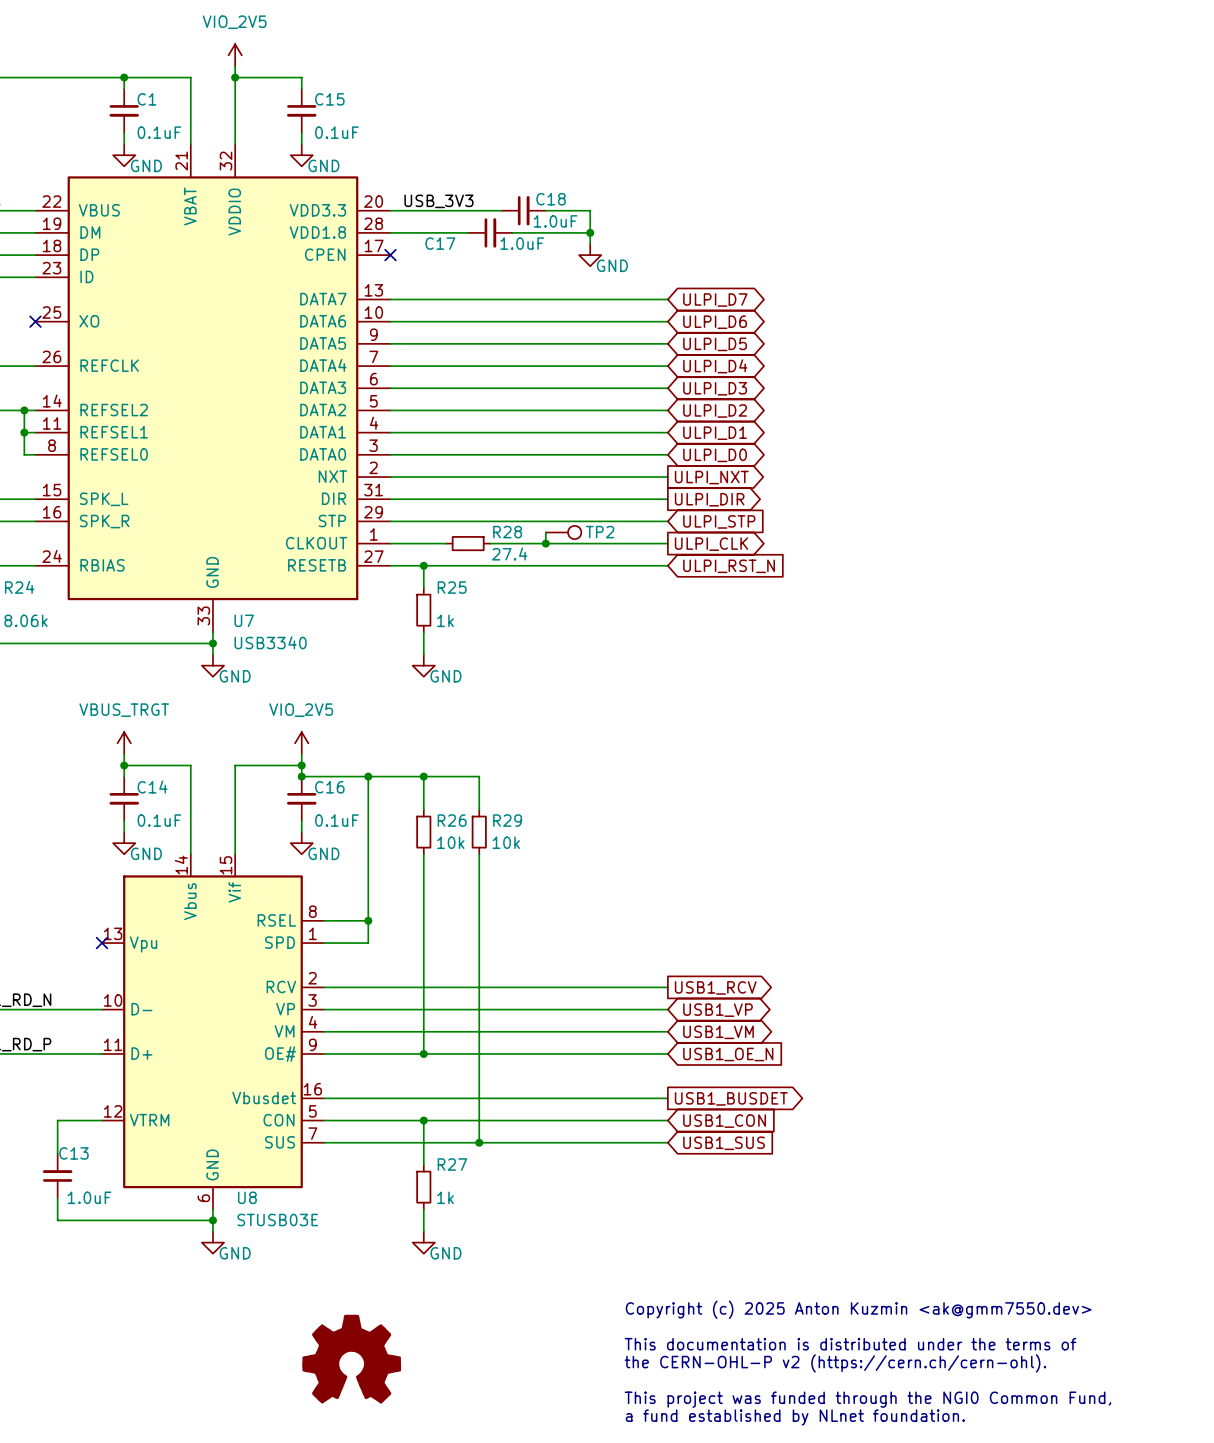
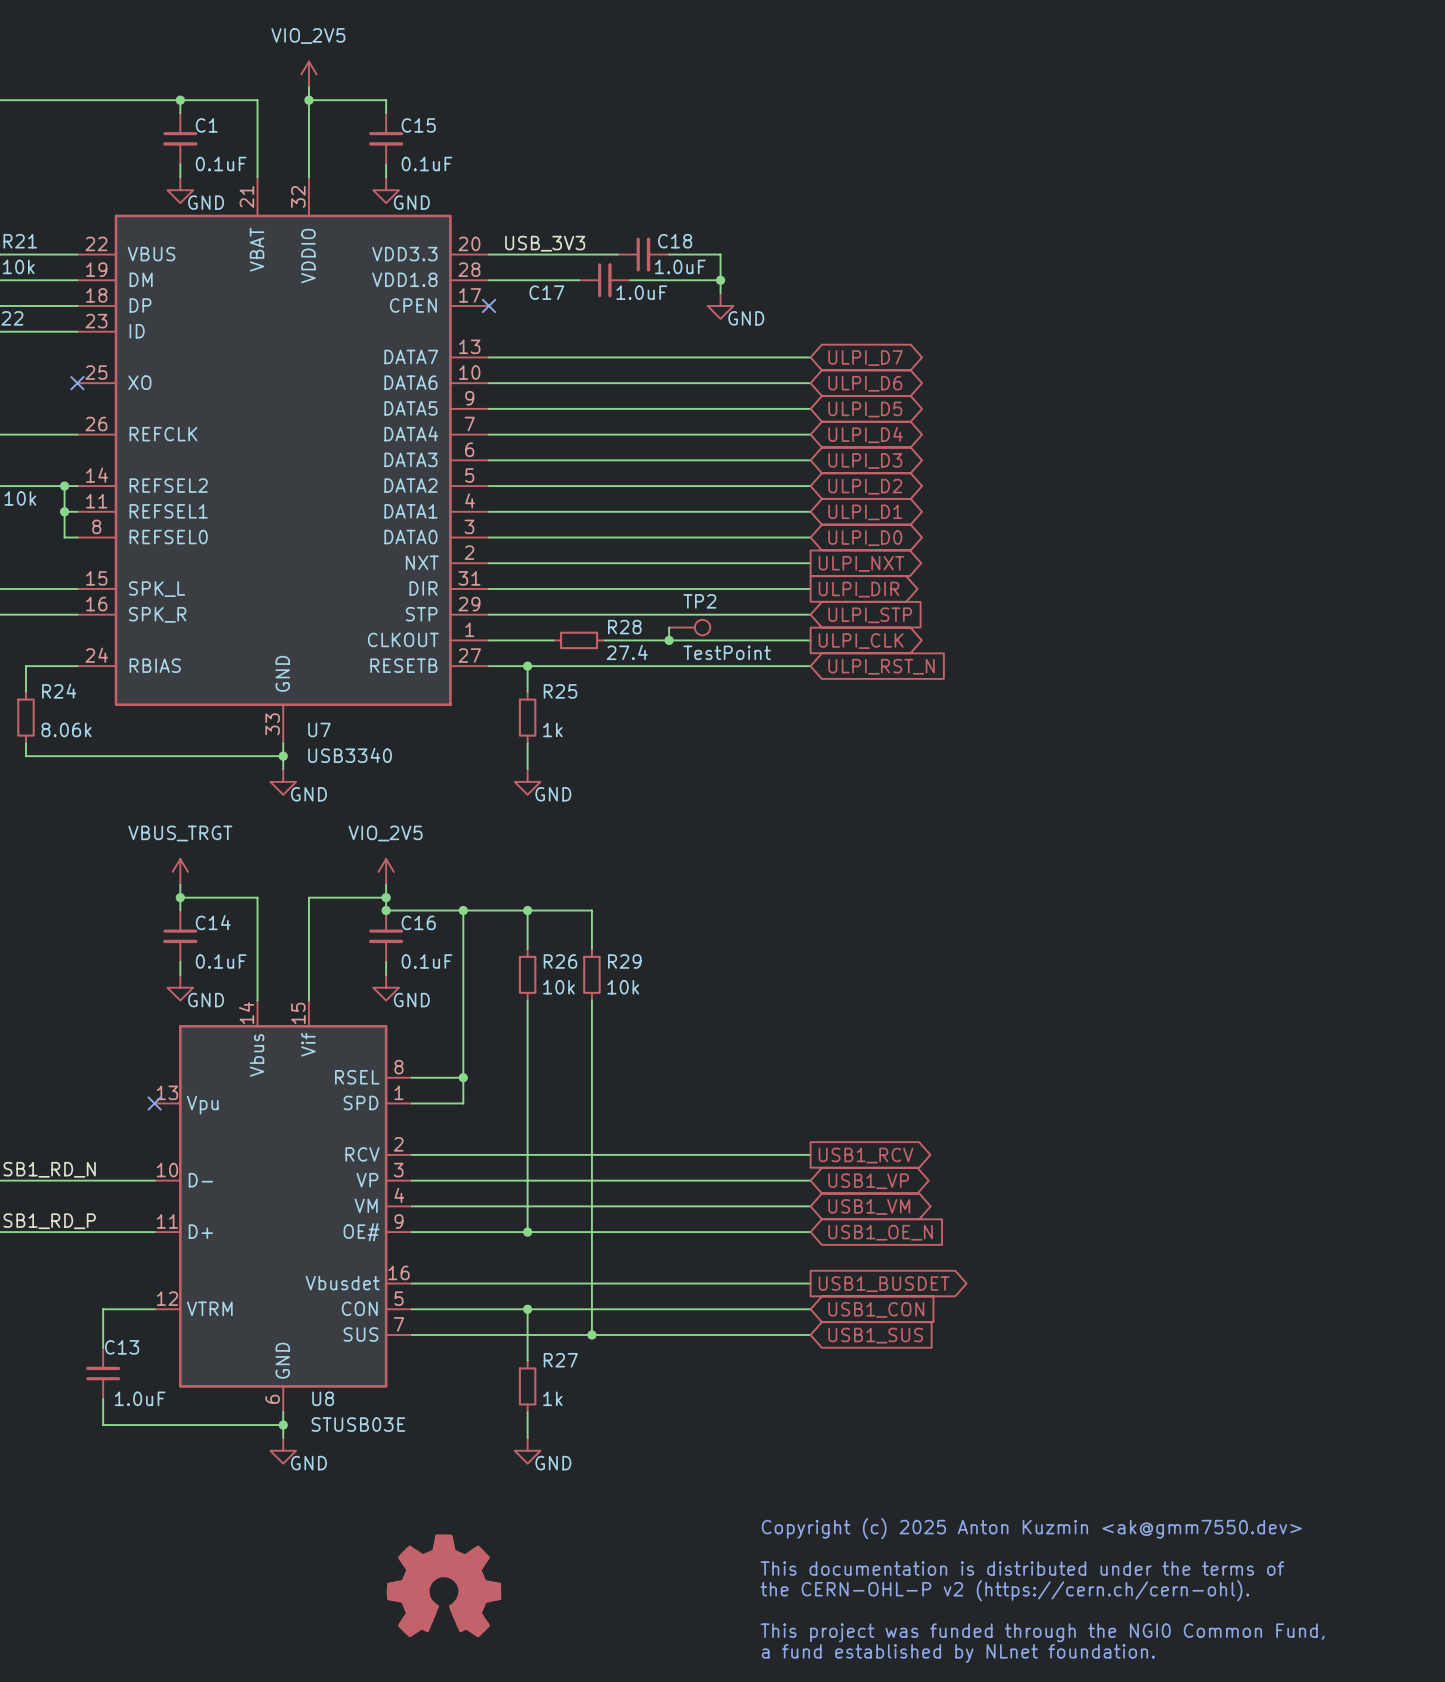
TP2 name position: TP2 (600, 532) -> TP2 (699, 601)
TP2 value: none -> TestPoint (727, 652)

